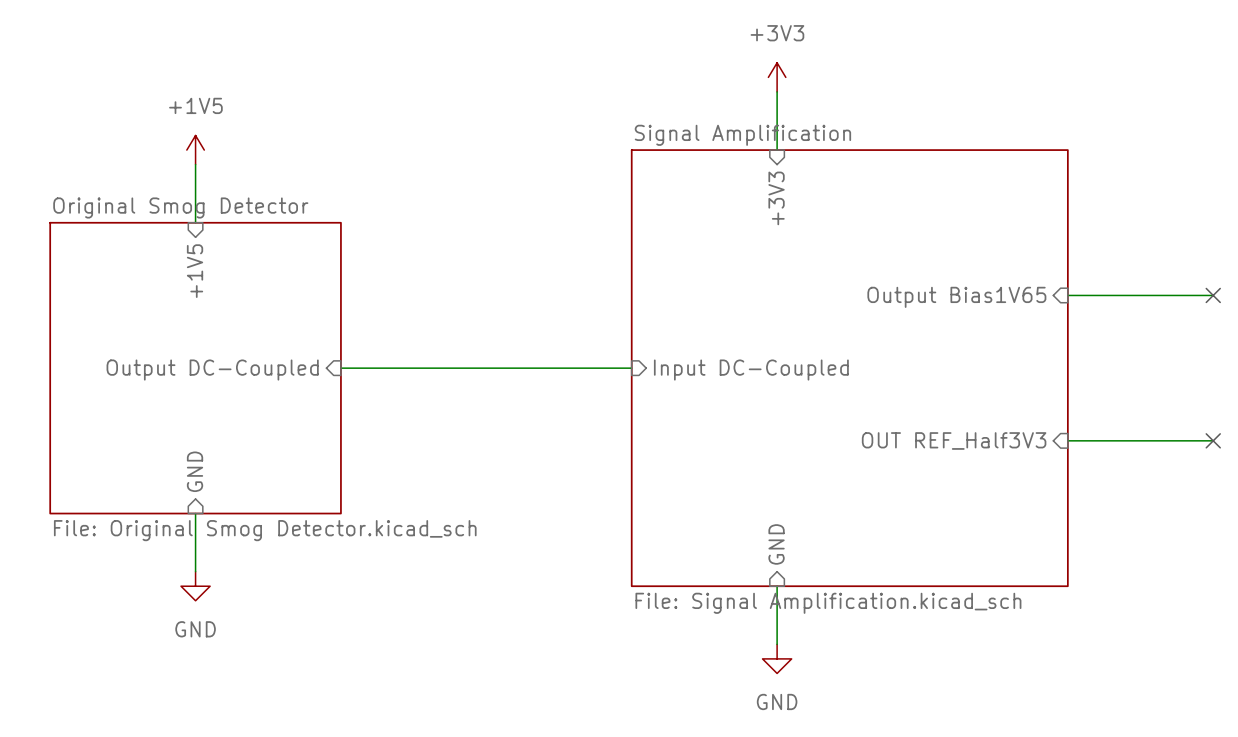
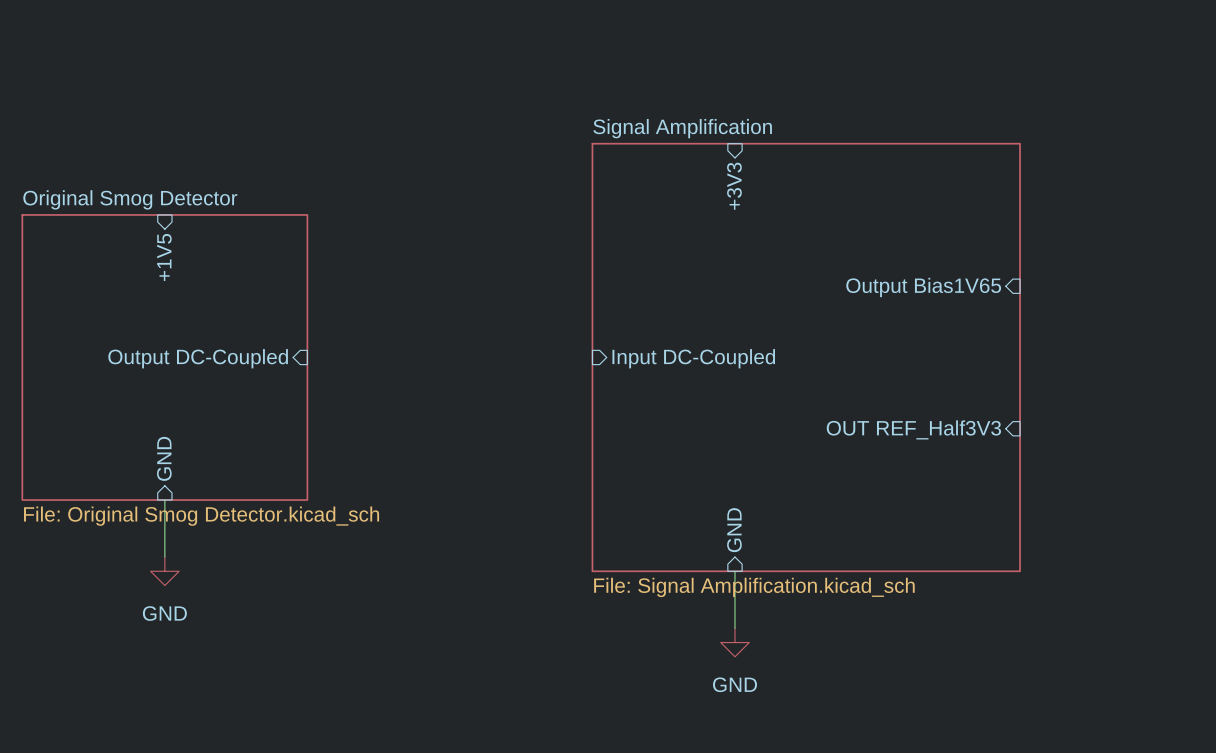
power symbol: +3V3 (777, 77) -> none
wire: (777, 91) (777, 150) -> none
power symbol: +1V5 (195, 150) -> none
wire: (195, 164) (195, 222) -> none
wire: (1067, 295) (1213, 295) -> none
no-connect mark: (1213, 295) -> none
wire: (340, 368) (631, 368) -> none
wire: (1067, 440) (1213, 440) -> none
no-connect mark: (1213, 440) -> none

